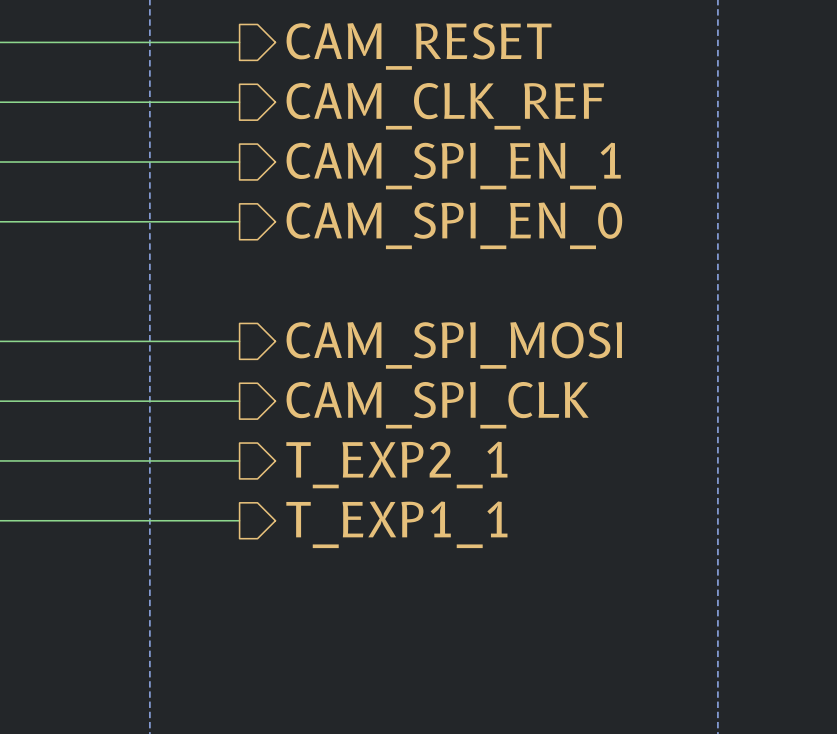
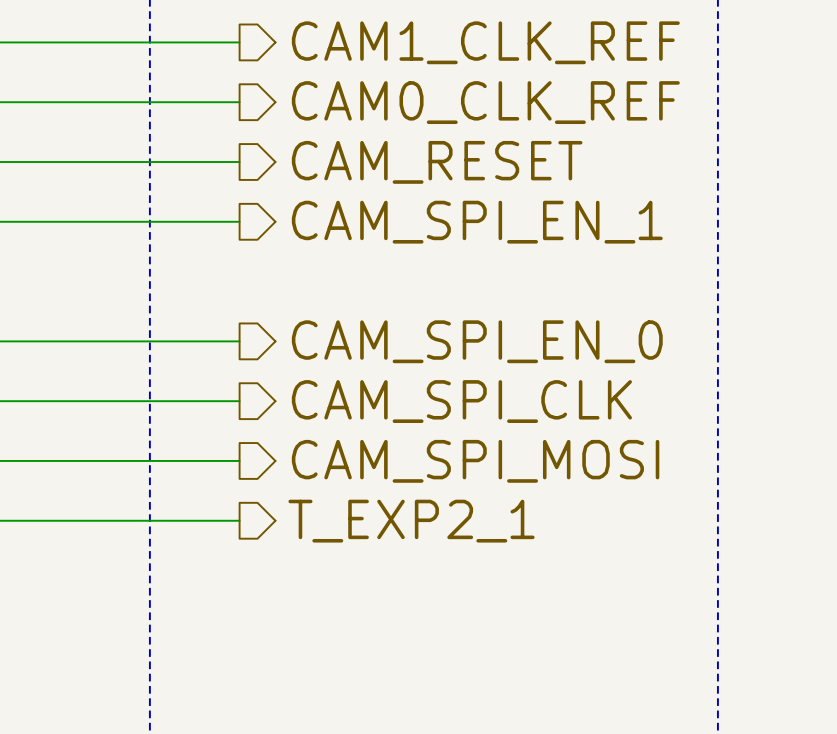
hierarchical label: CAM_RESET (419, 46) -> CAM1_CLK_REF (485, 42)
hierarchical label: CAM_CLK_REF (445, 106) -> CAM0_CLK_REF (485, 102)
hierarchical label: CAM_SPI_EN_1 (453, 166) -> CAM_RESET (437, 162)
hierarchical label: CAM_SPI_EN_0 (454, 225) -> CAM_SPI_EN_1 (477, 222)
hierarchical label: CAM_SPI_MOSI (454, 345) -> CAM_SPI_EN_0 (477, 341)
hierarchical label: T_EXP2_1 (396, 464) -> CAM_SPI_MOSI (475, 461)
hierarchical label: T_EXP1_1 (396, 524) -> T_EXP2_1 (411, 521)

